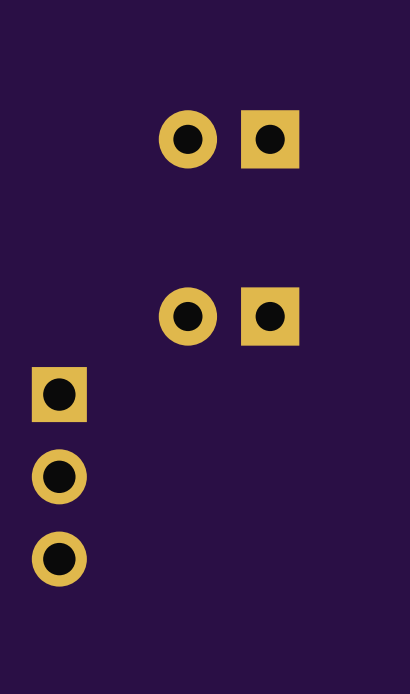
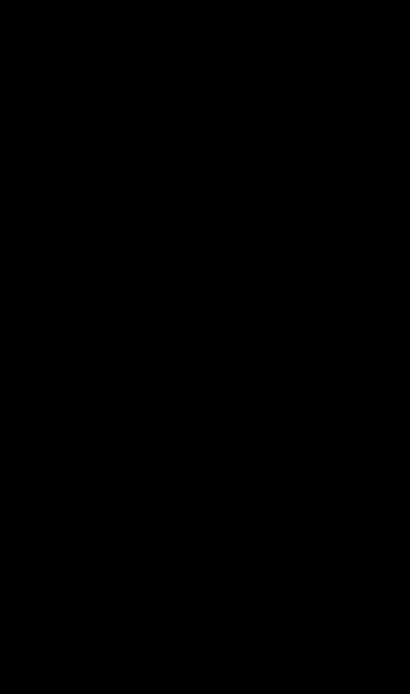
part: (229, 139) -> none
part: (229, 316) -> none
part: (59, 476) -> none

